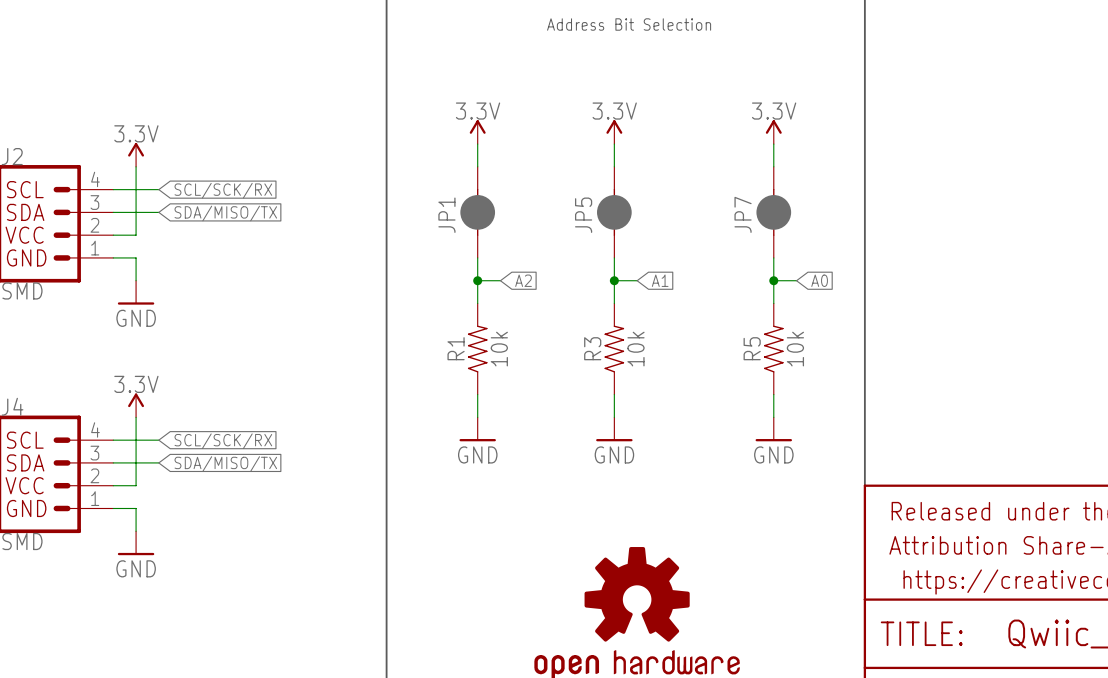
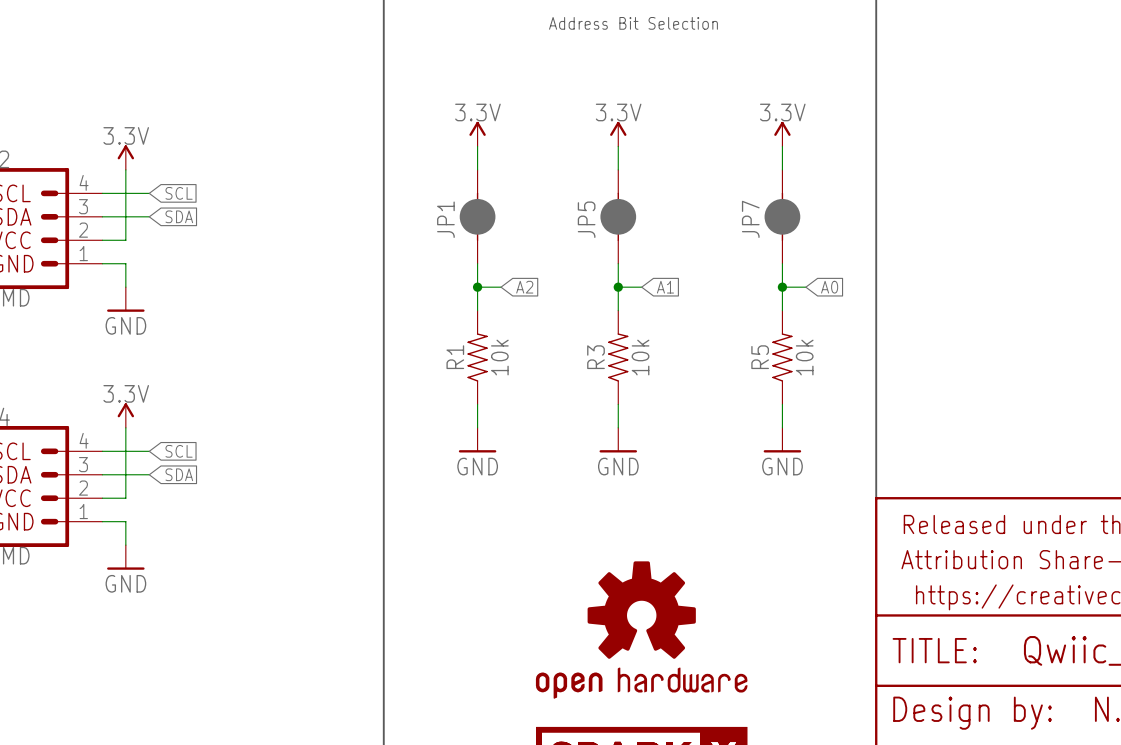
global label: SCL/SCK/RX (223, 190) -> SCL (179, 193)
global label: SDA/MISO/TX (225, 213) -> SDA (179, 216)
global label: SCL/SCK/RX (223, 441) -> SCL (179, 451)
global label: SDA/MISO/TX (225, 464) -> SDA (179, 474)

